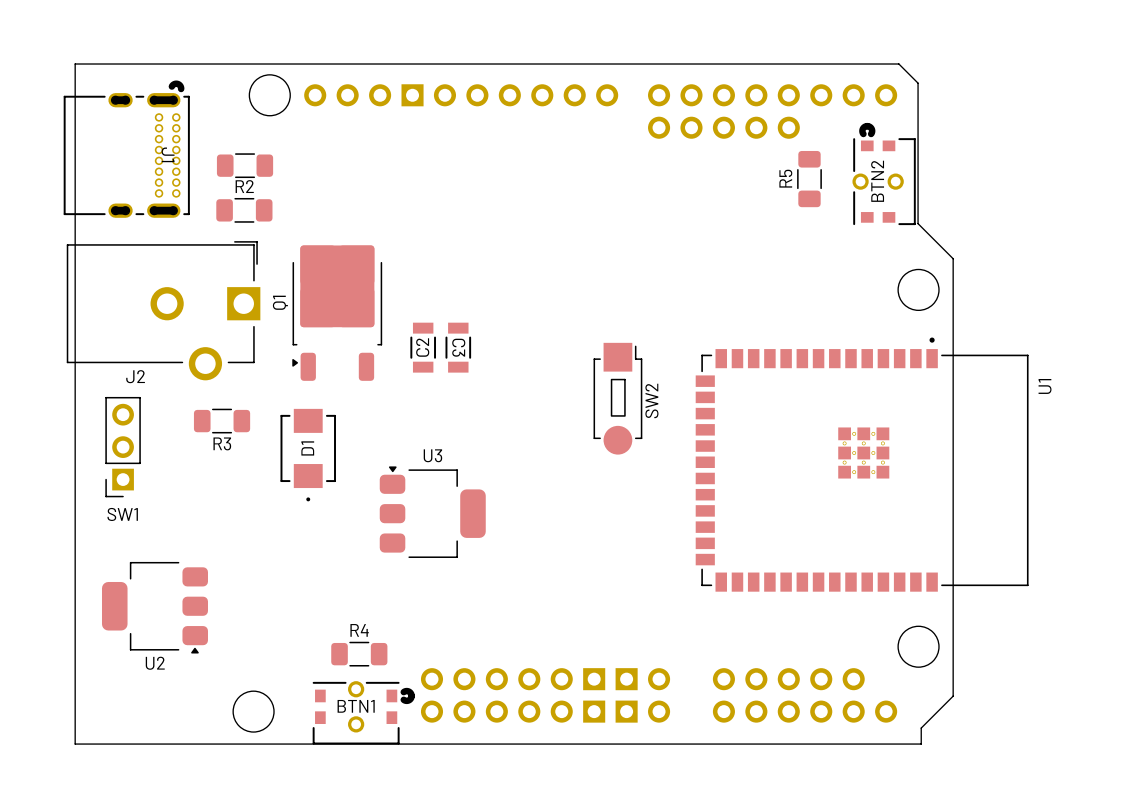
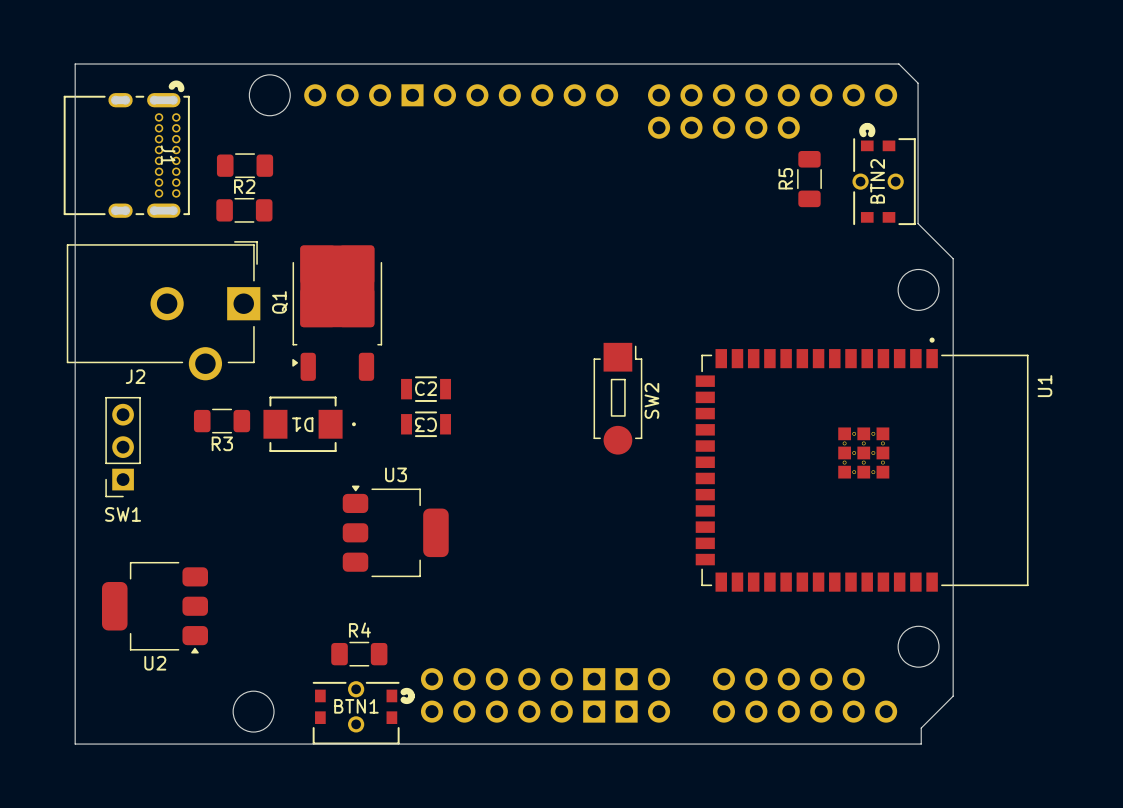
C2 rotation: 0° (423, 347) -> 90° clockwise (426, 389)
C2 position: (423, 347) -> (426, 389)
C3 rotation: 0° (458, 347) -> 90° clockwise (426, 424)
C3 position: (458, 347) -> (426, 424)
D1 rotation: 0° (308, 455) -> 90° counterclockwise (309, 424)
U3 position: (432, 512) -> (395, 531)

